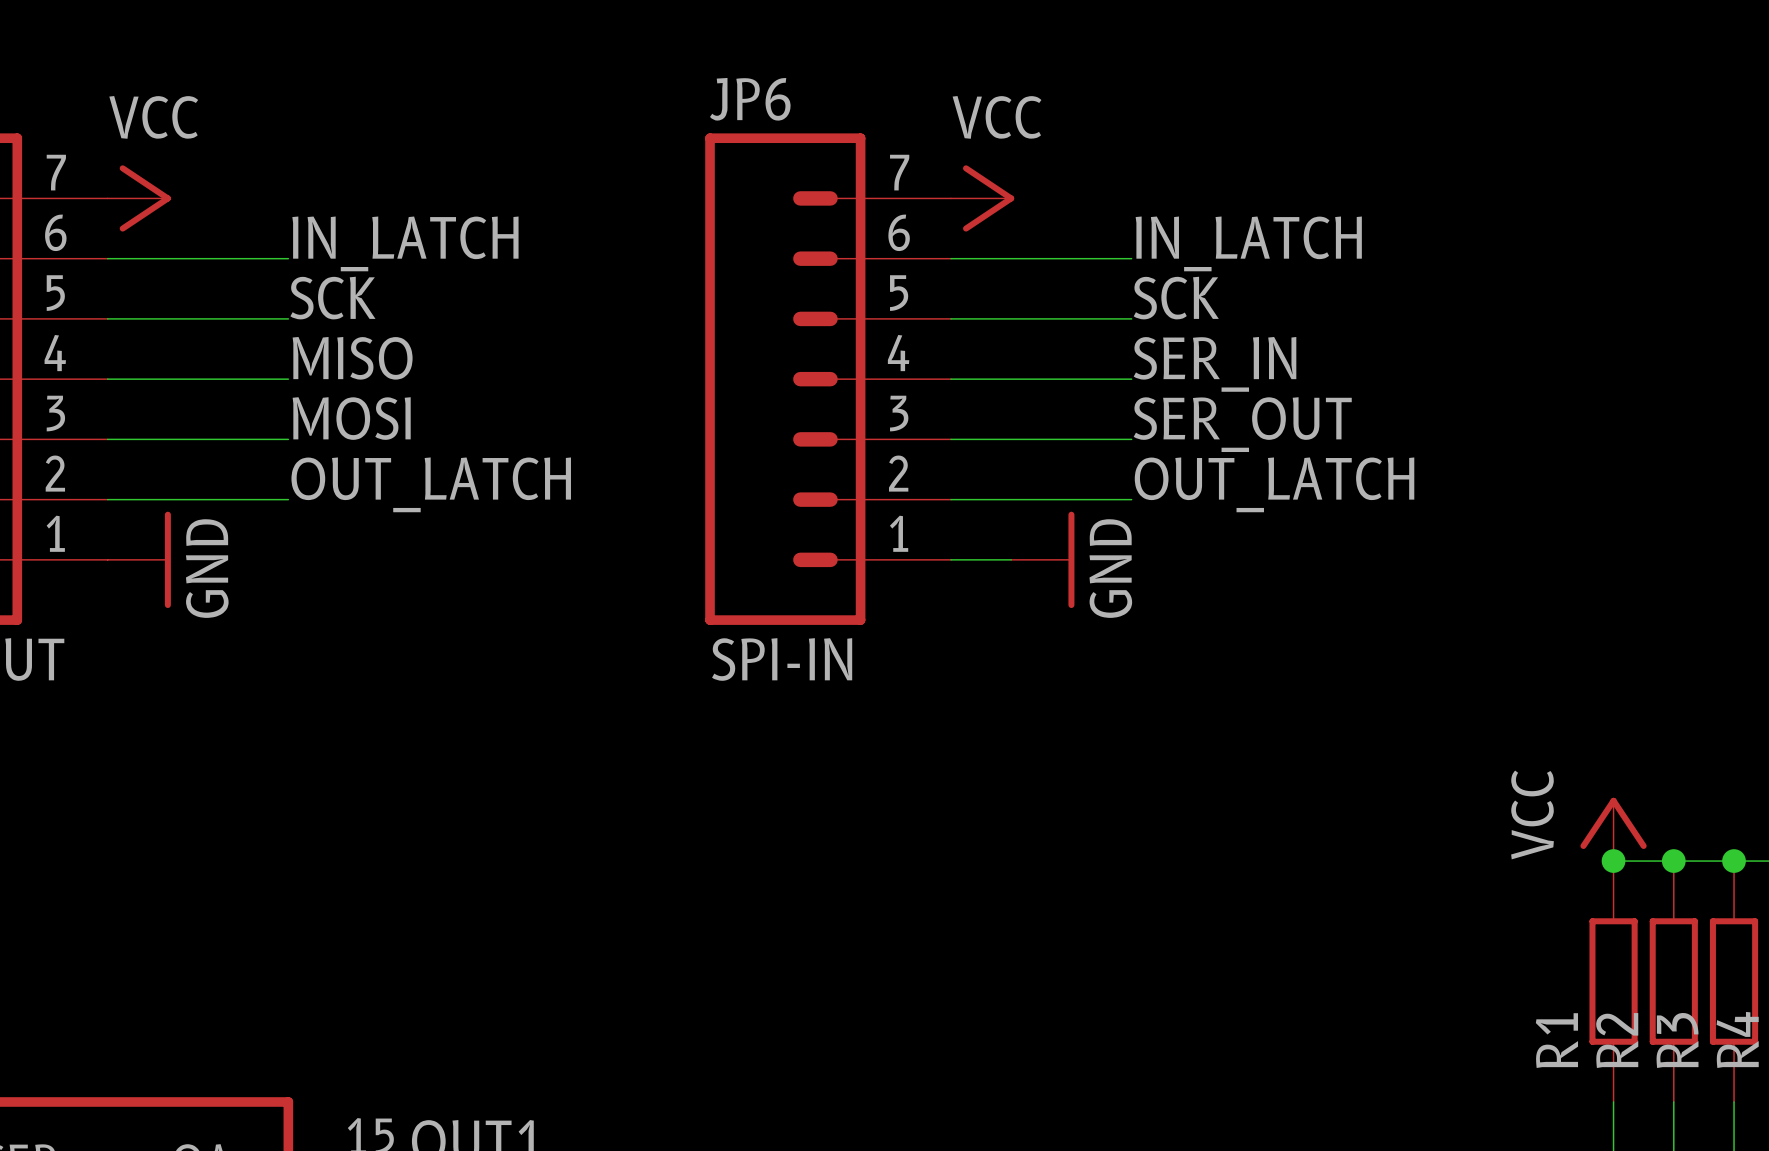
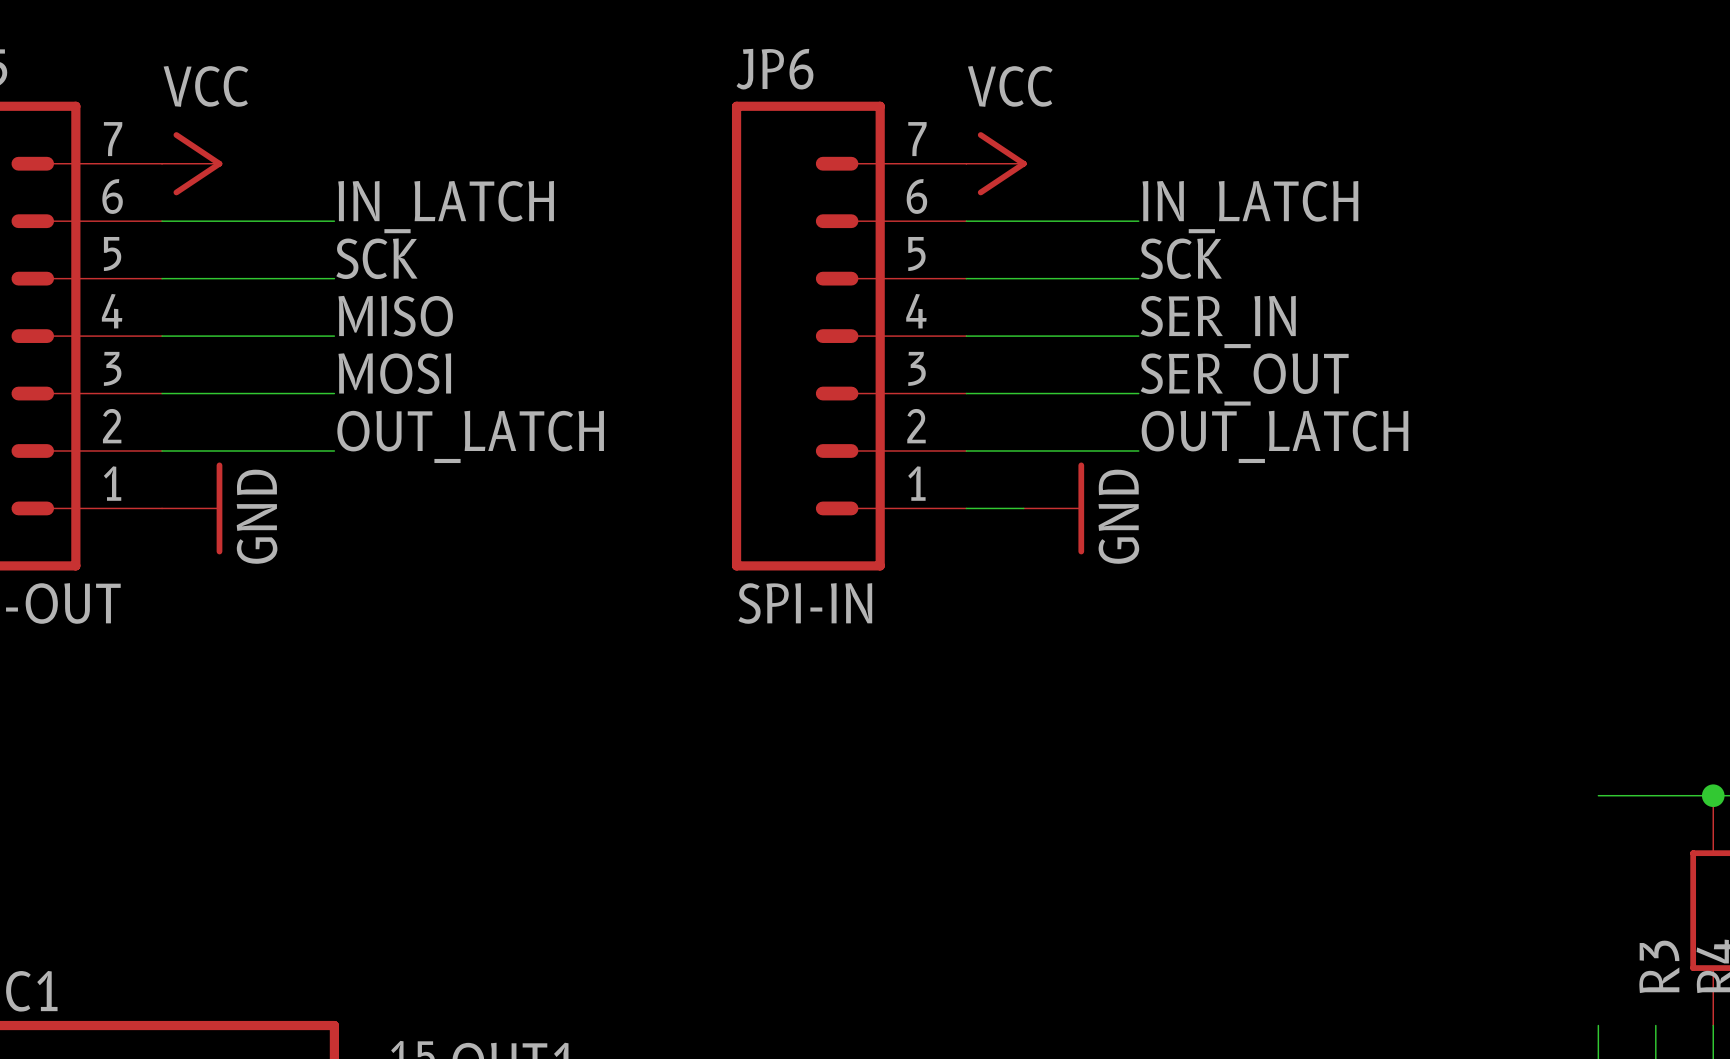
power symbol: VCC (1613, 829) -> none
junction: (1613, 861) -> none
junction: (1673, 861) -> none
R1: (1613, 981) -> none
R2: (1673, 981) -> none

